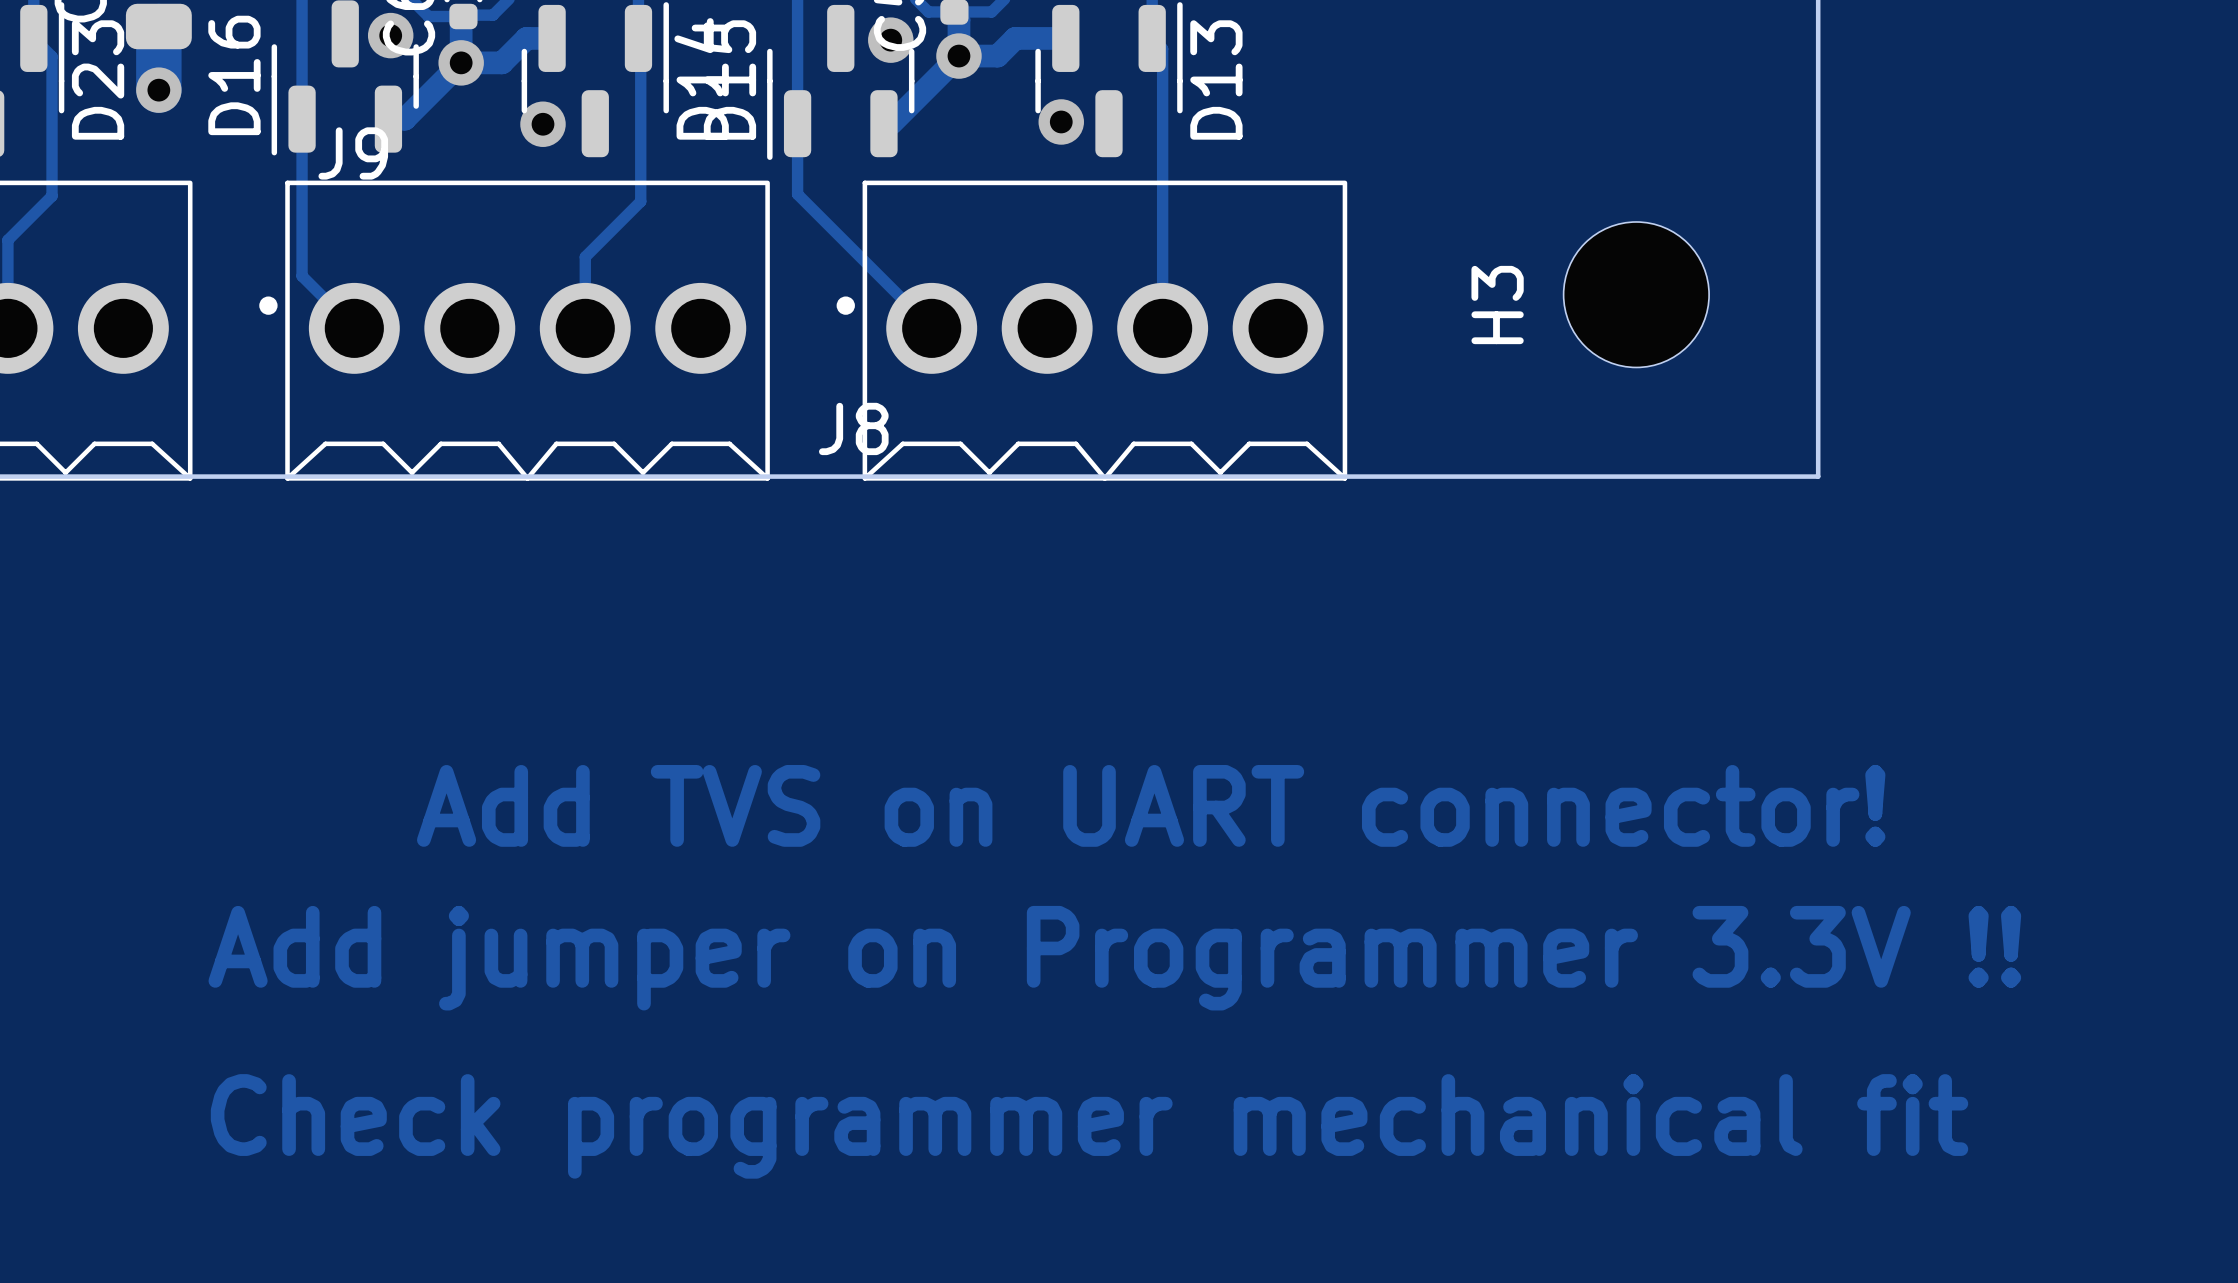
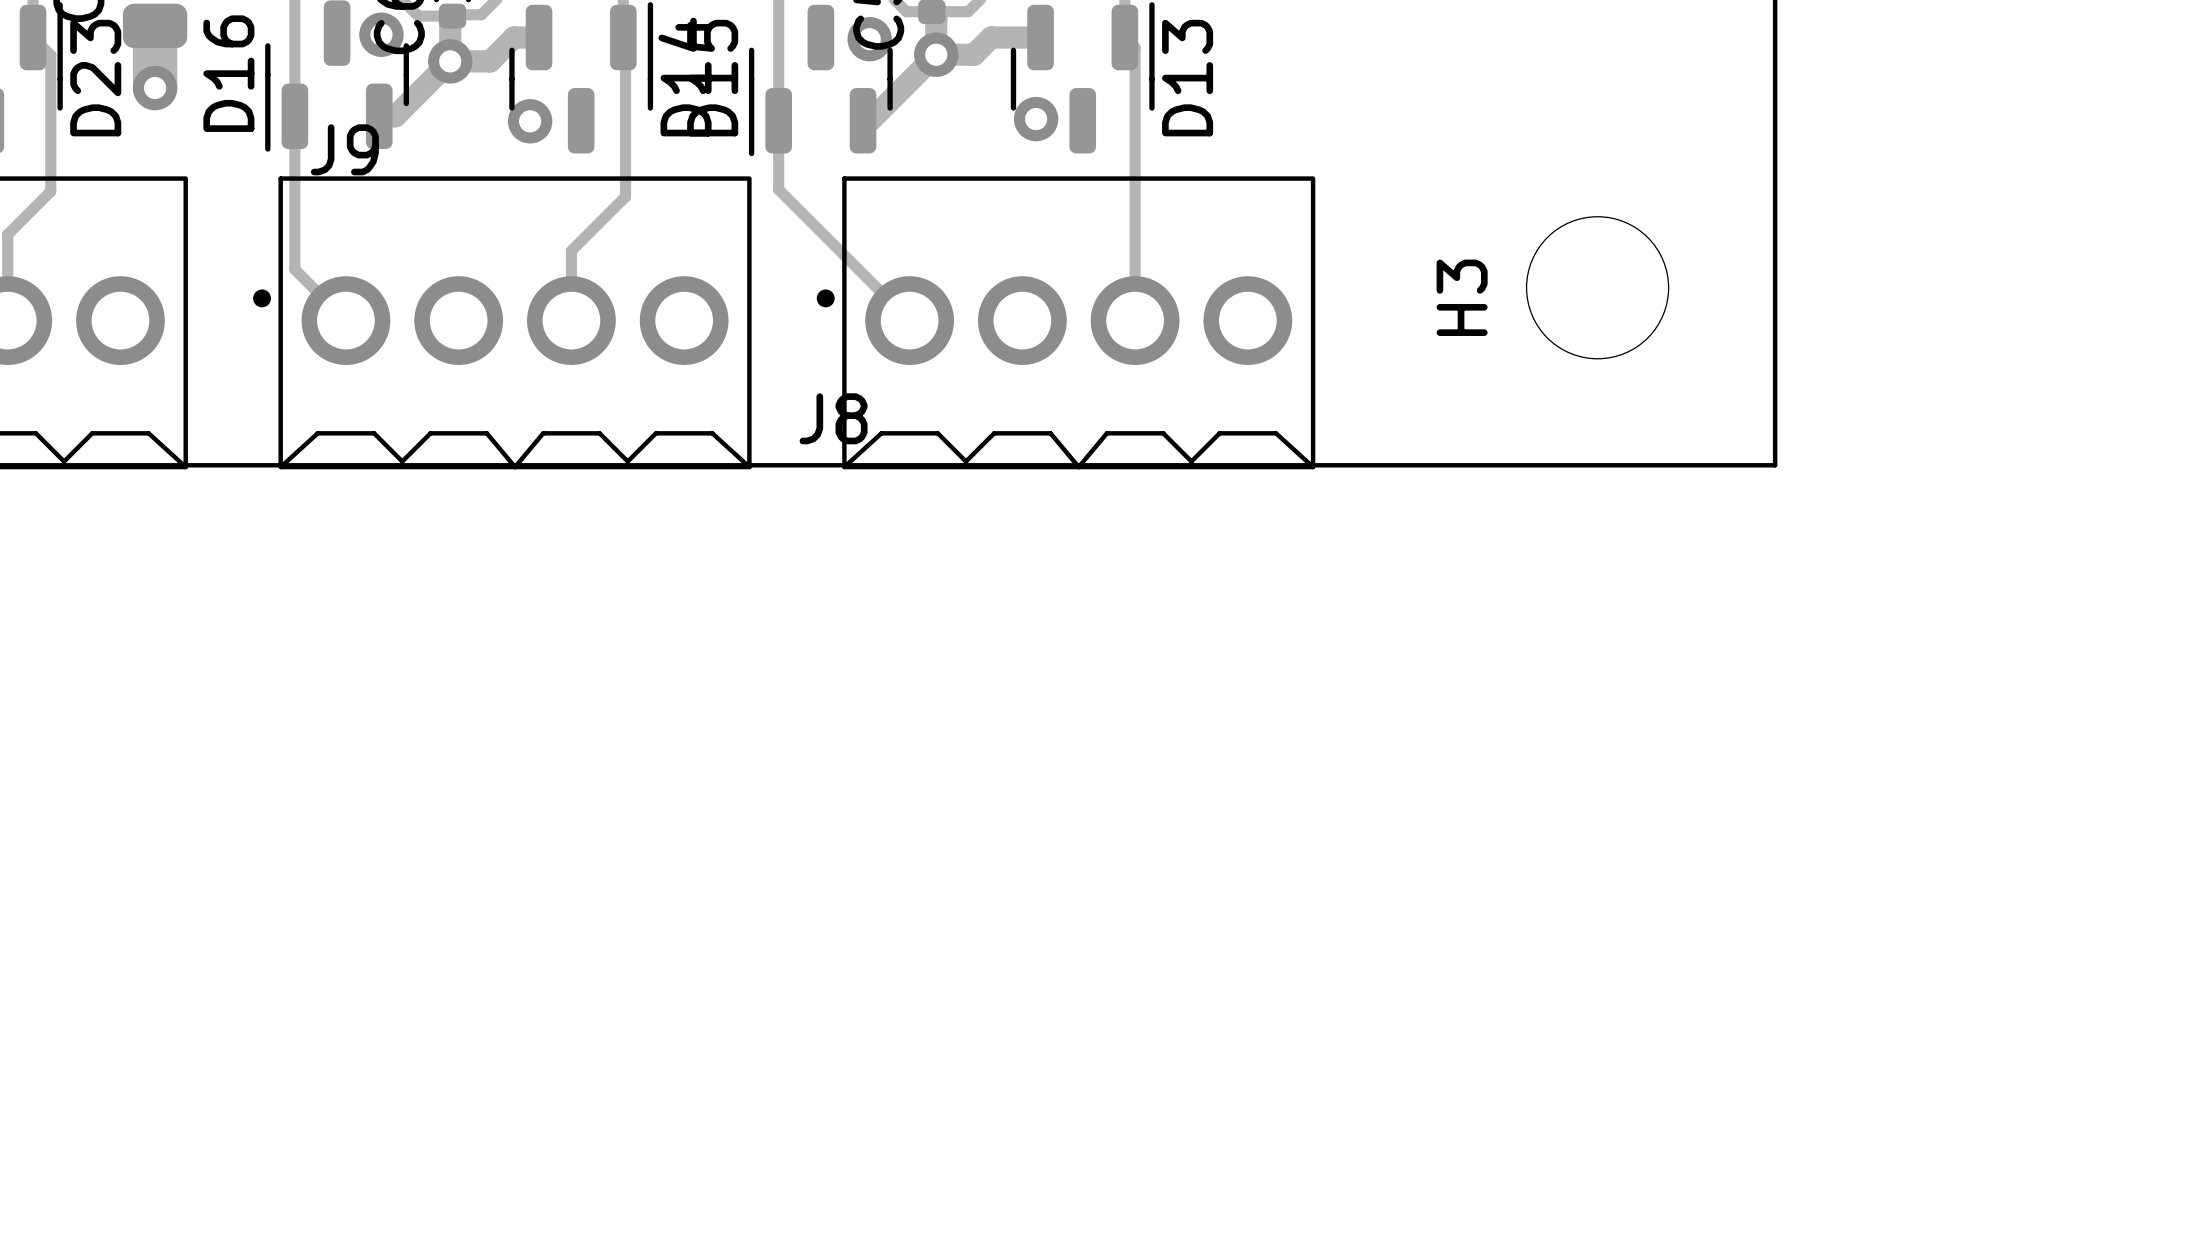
text: Add TVS on UART connector! (1151, 805) -> none
text: Add jumper on Programmer 3.3V !! (1114, 958) -> none
text: Check programmer mechanical fit (1089, 1126) -> none

